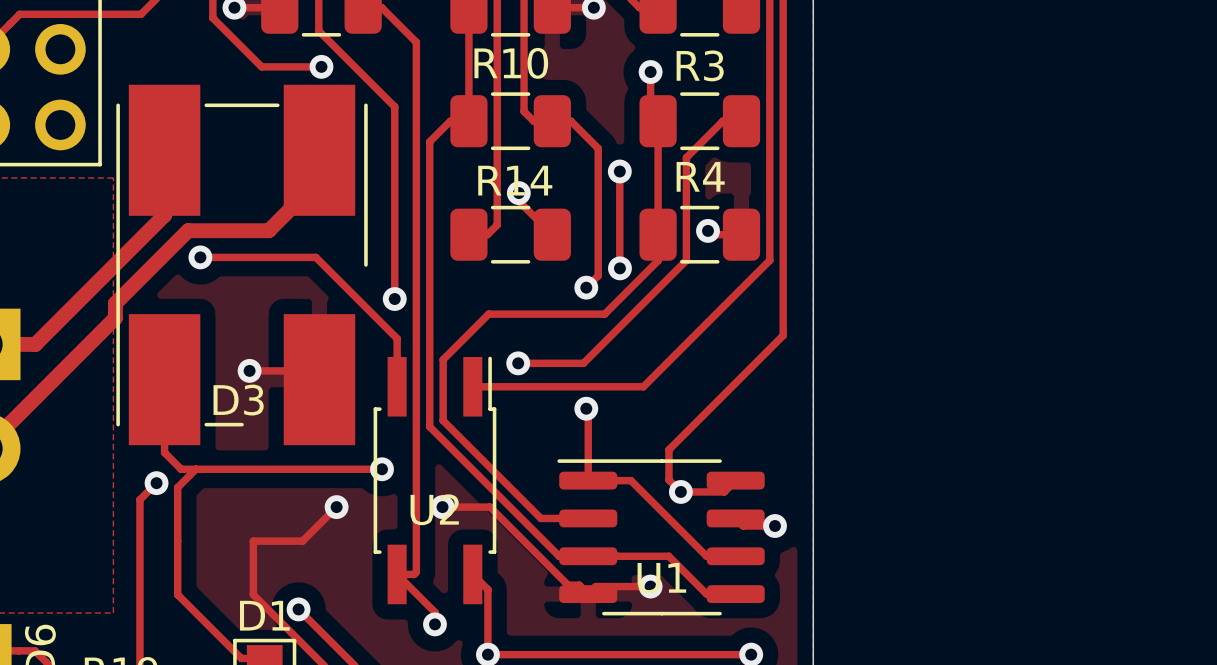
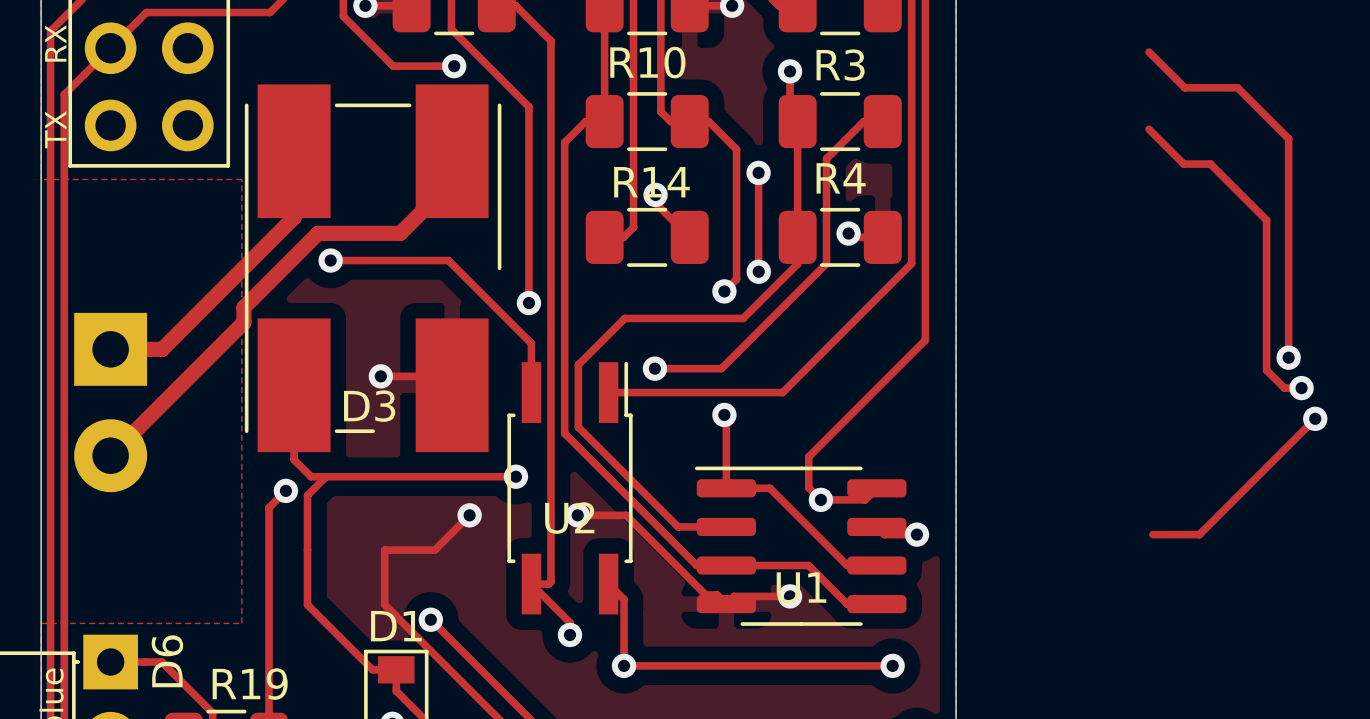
track: none -> (1149, 52) (1184, 87) (1237, 87) (1288, 138) (1288, 357)
track: none -> (1149, 129) (1183, 164) (1210, 164) (1266, 220) (1266, 370) (1284, 388) (1301, 388)
via: none -> (1288, 357)
via: none -> (1301, 388)
track: none -> (1315, 418) (1199, 534) (1152, 534)
via: none -> (1315, 418)

